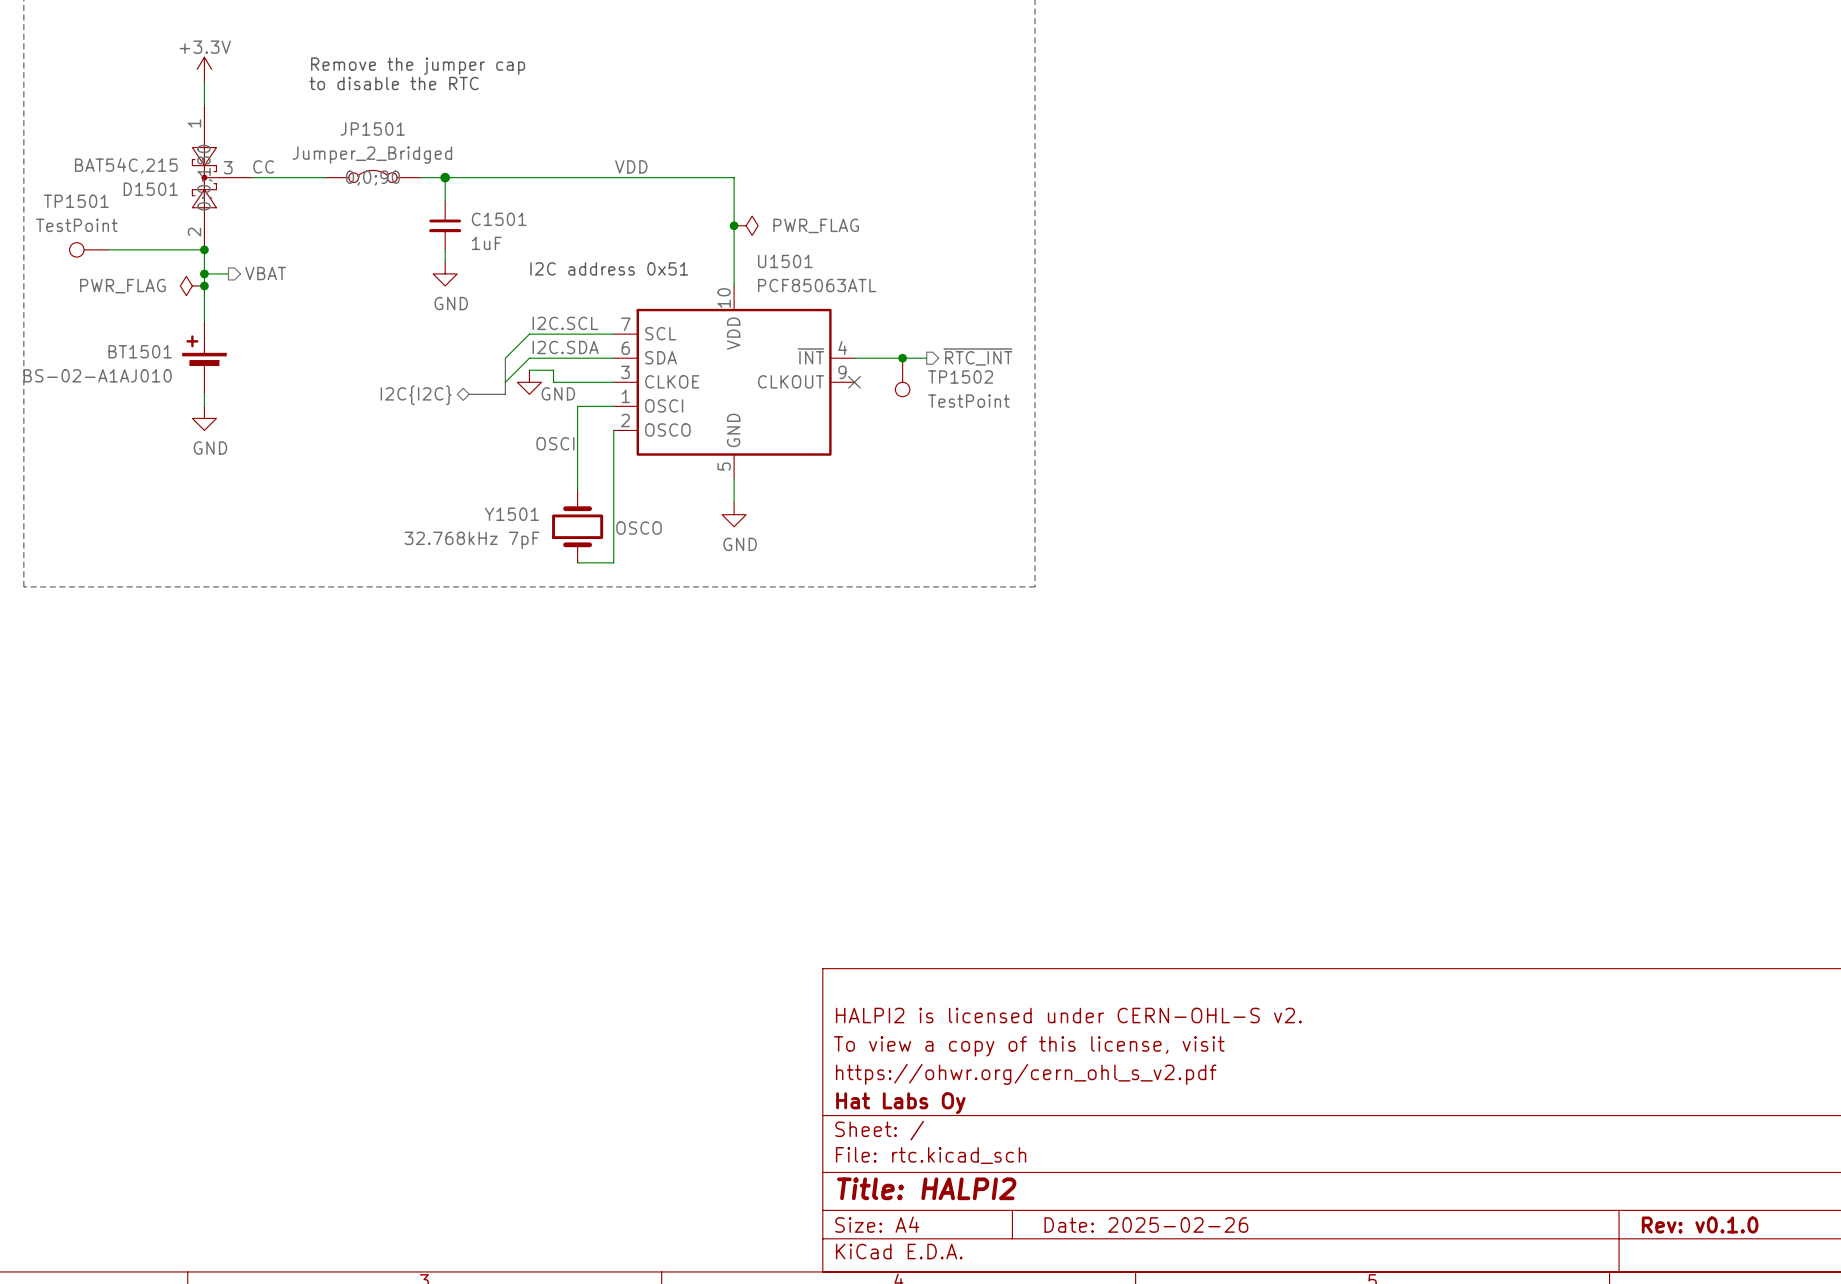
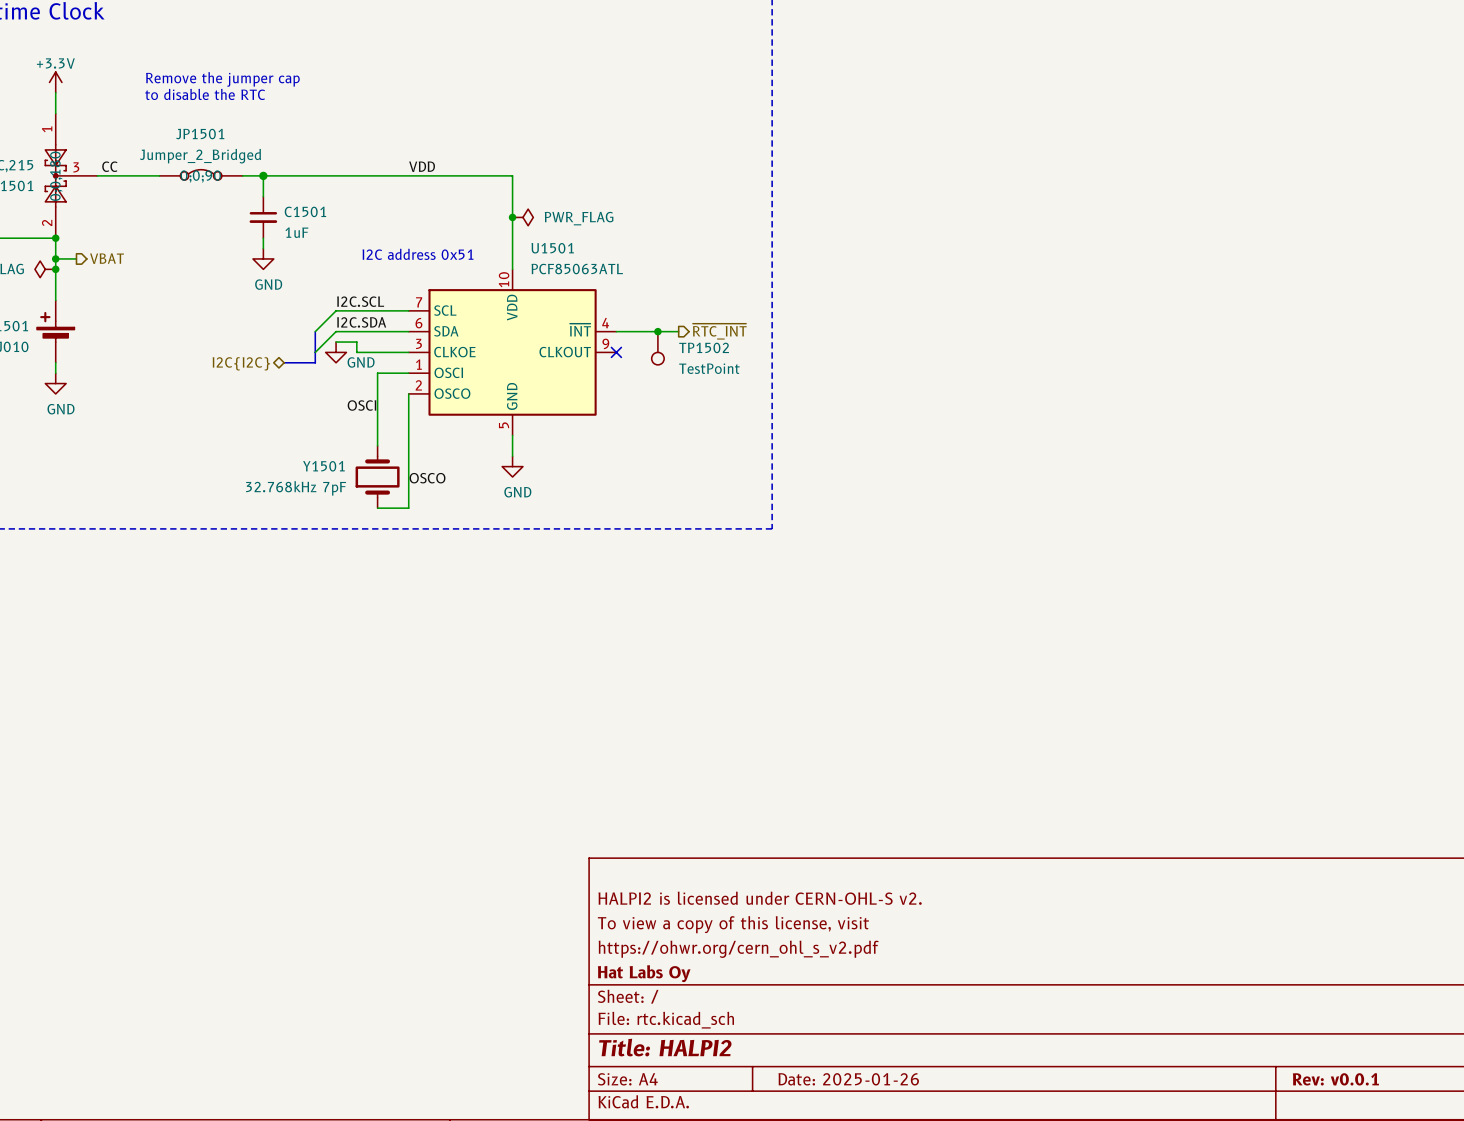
title block: Date: 2025-02-26 (1146, 1224) -> Date: 2025-01-26 (848, 1079)
title block: Rev: v0.1.0 (1700, 1224) -> Rev: v0.0.1 (1335, 1079)

